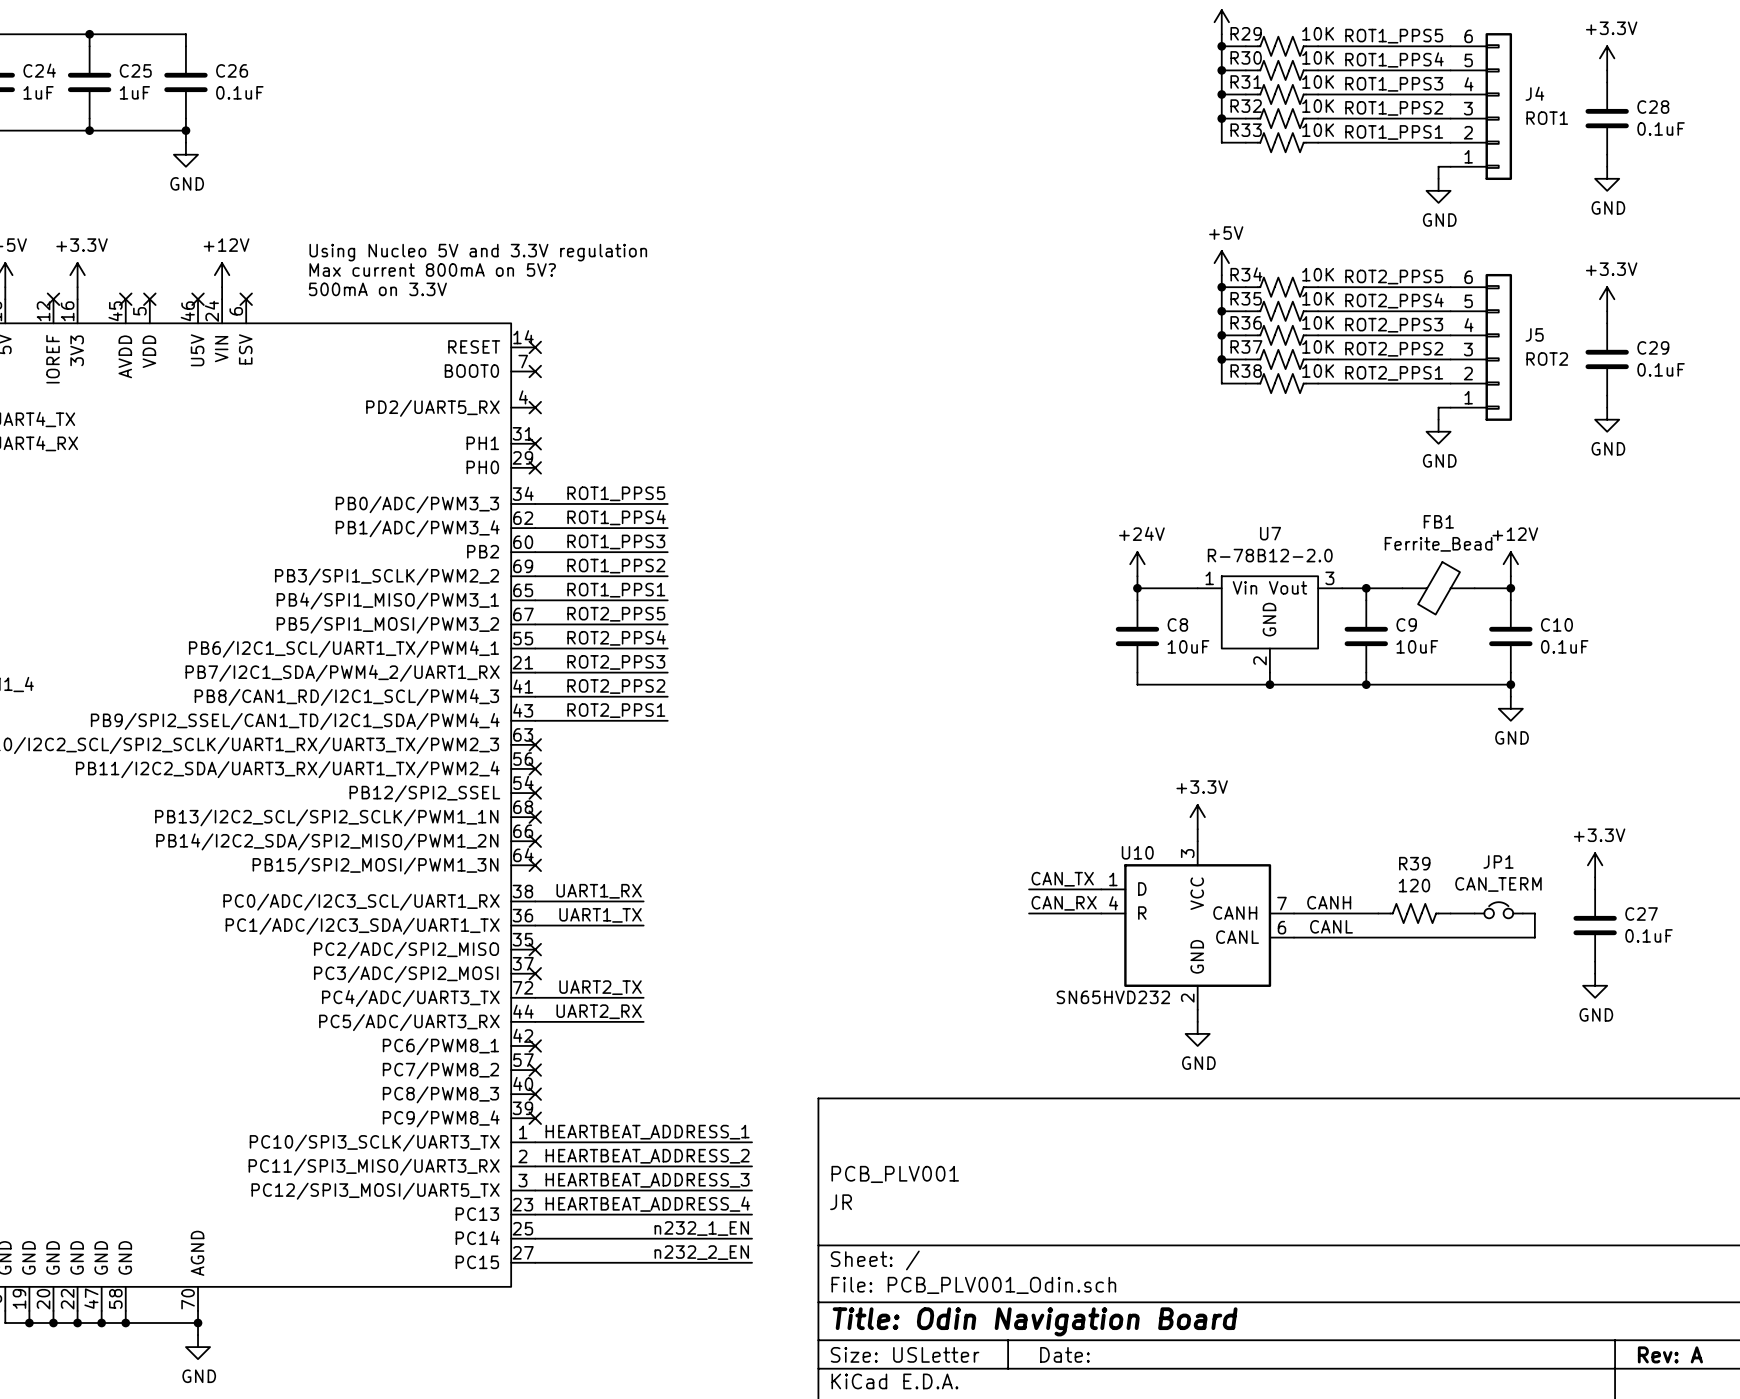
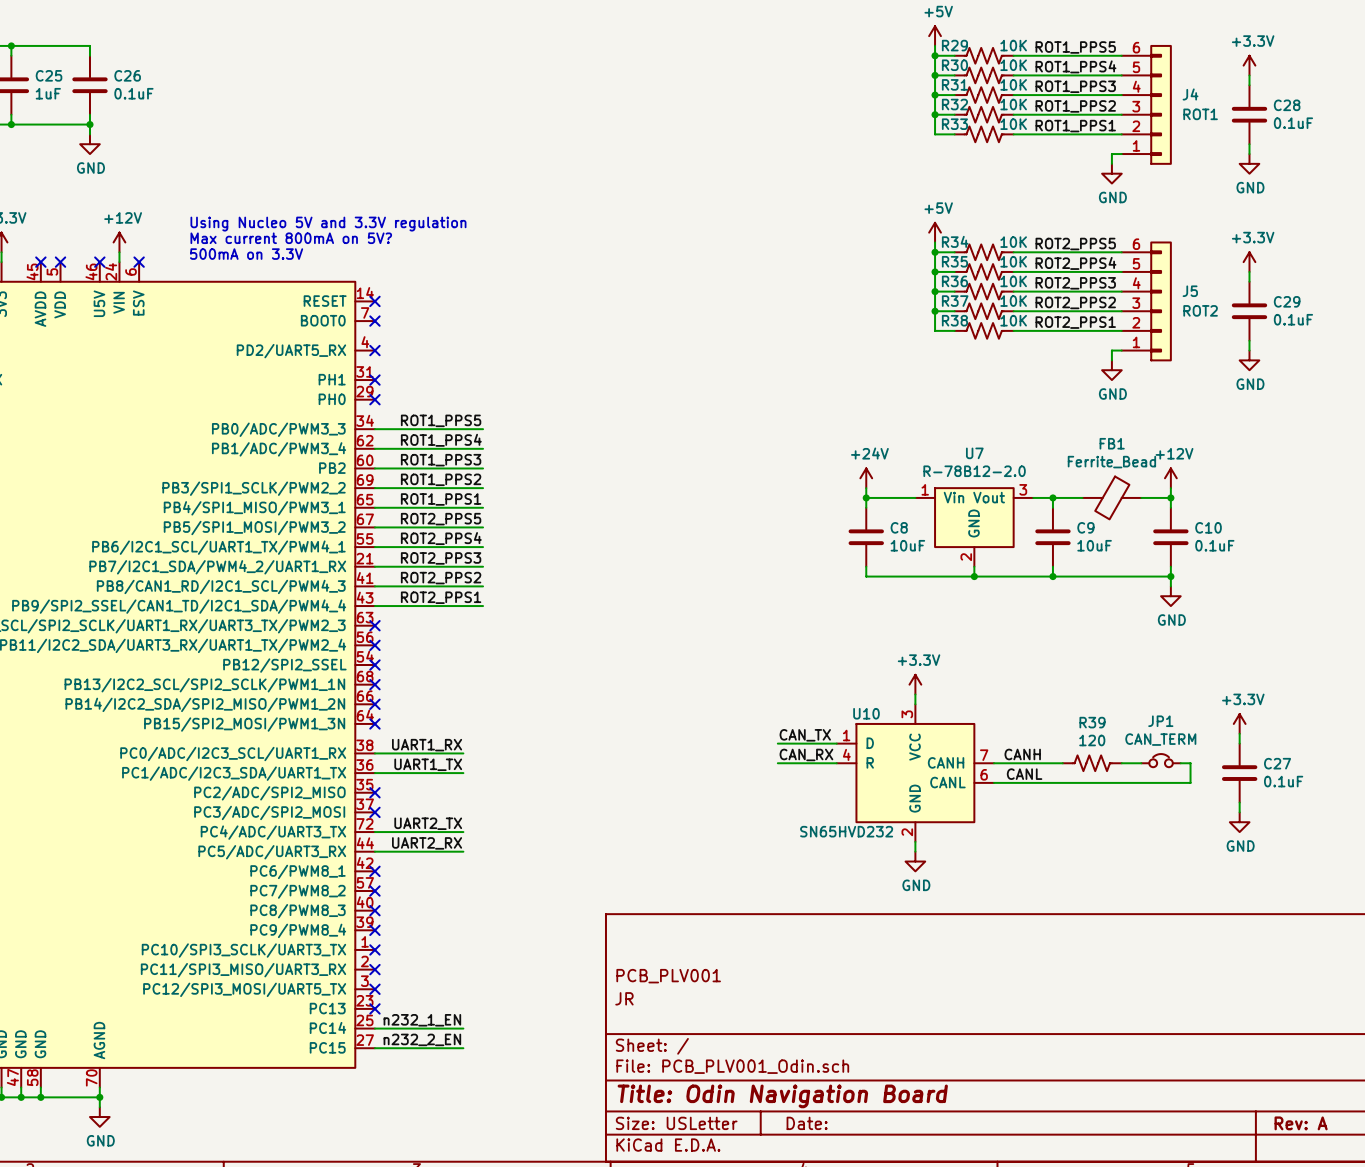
label: HEARTBEAT_ADDRESS_1 (647, 1132) -> none
wire: (535, 1142) (752, 1142) -> none
no-connect mark: none -> (374, 949)
label: HEARTBEAT_ADDRESS_2 (647, 1156) -> none
wire: (535, 1166) (752, 1166) -> none
no-connect mark: none -> (374, 969)
label: HEARTBEAT_ADDRESS_3 (647, 1180) -> none
wire: (535, 1190) (752, 1190) -> none
no-connect mark: none -> (374, 989)
label: HEARTBEAT_ADDRESS_4 (647, 1204) -> none
wire: (535, 1214) (752, 1214) -> none
no-connect mark: none -> (374, 1008)
label position: n232_1_EN (701, 1228) -> n232_1_EN (422, 1020)
wire: (643, 1238) (752, 1238) -> none
label position: n232_2_EN (701, 1252) -> n232_2_EN (422, 1039)
wire: (643, 1262) (752, 1262) -> none

